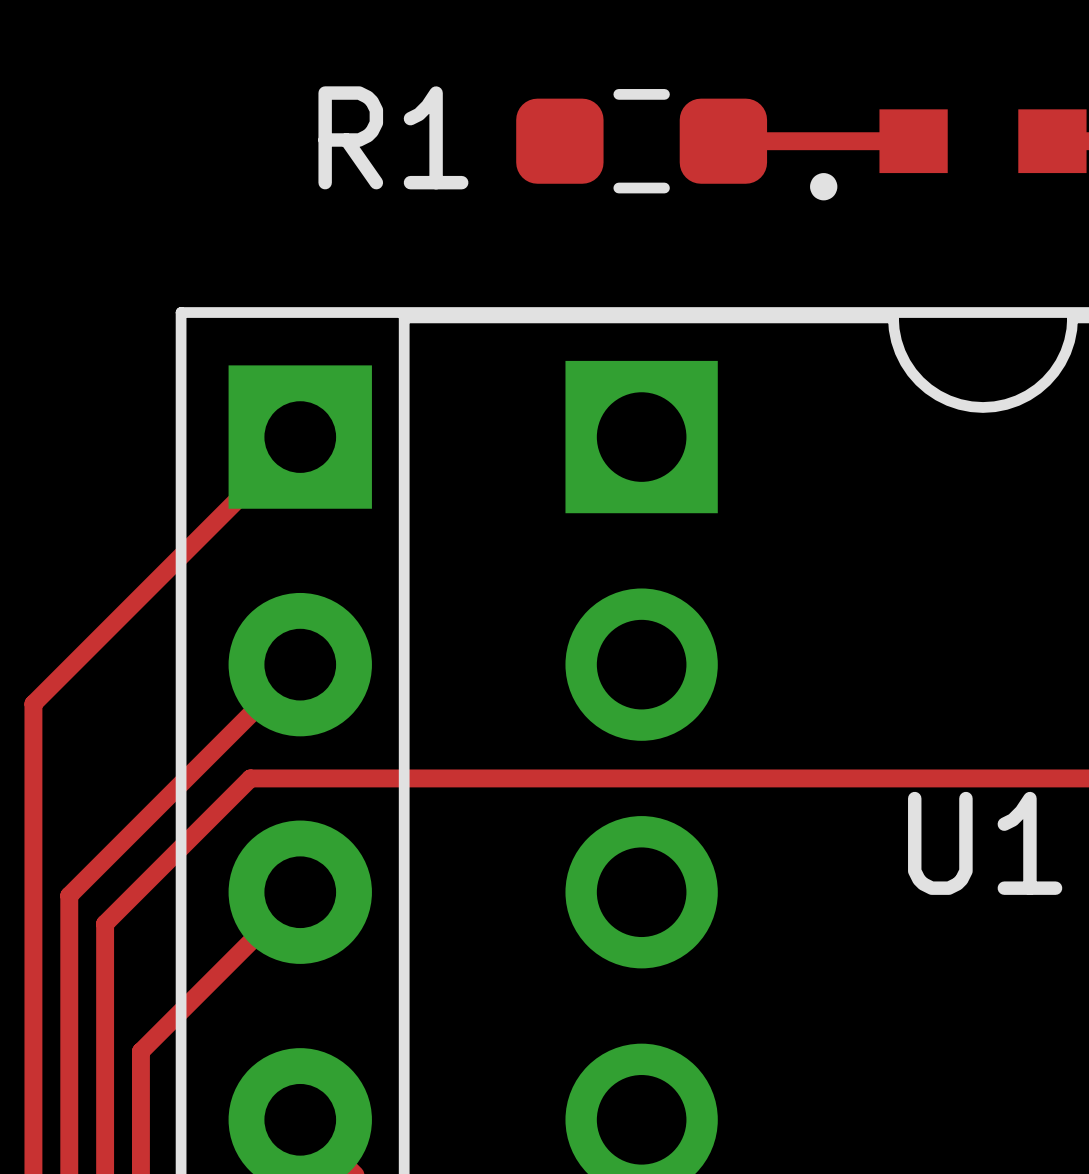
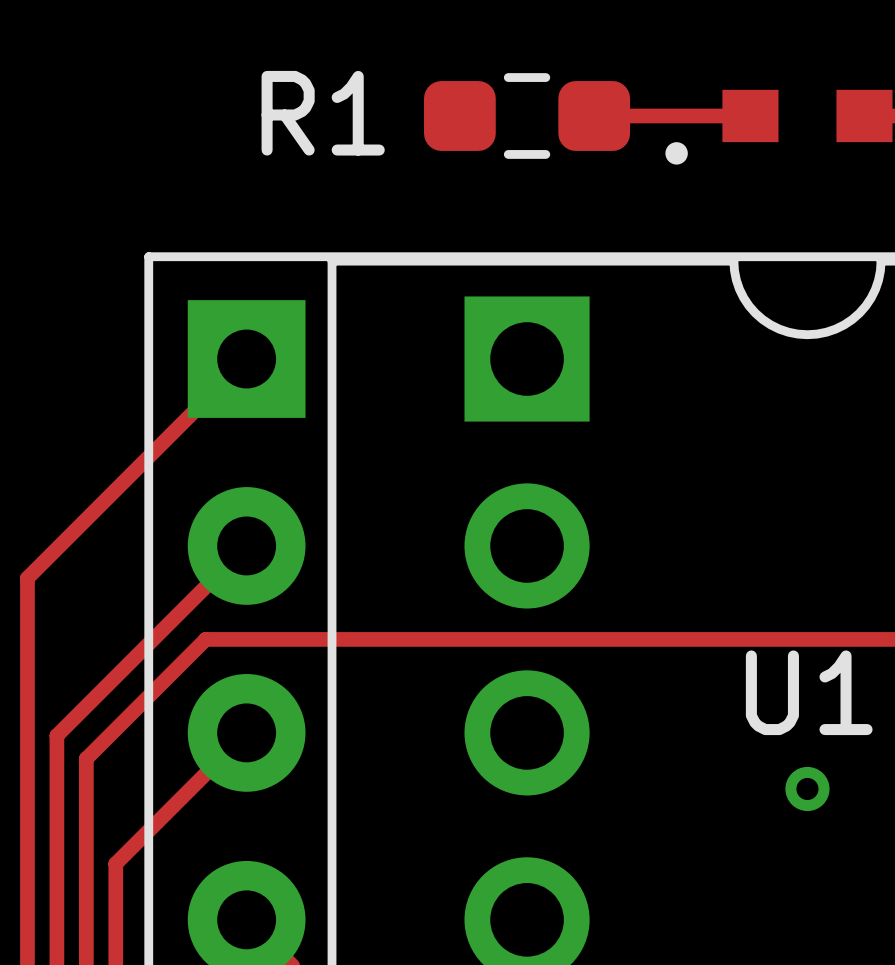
via: none -> (807, 788)

